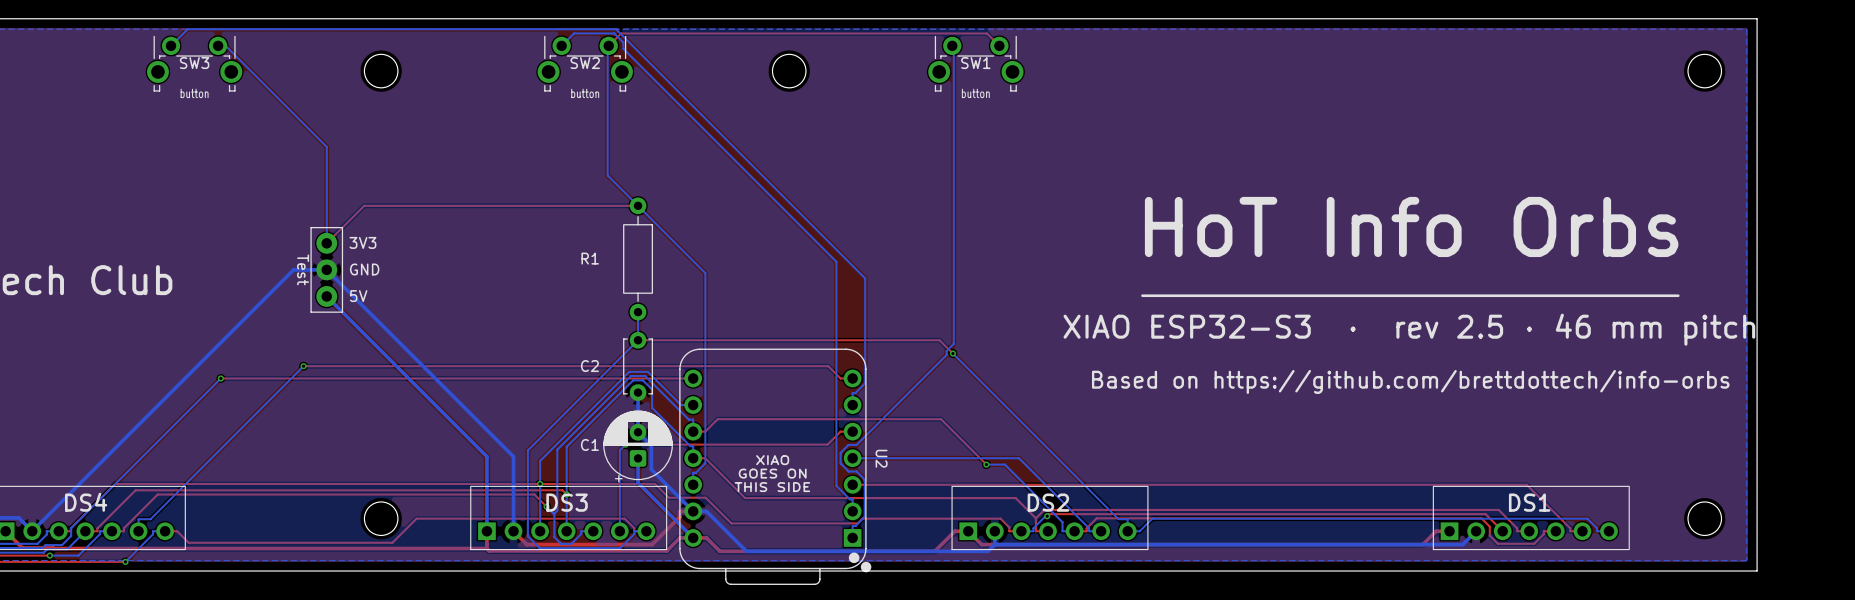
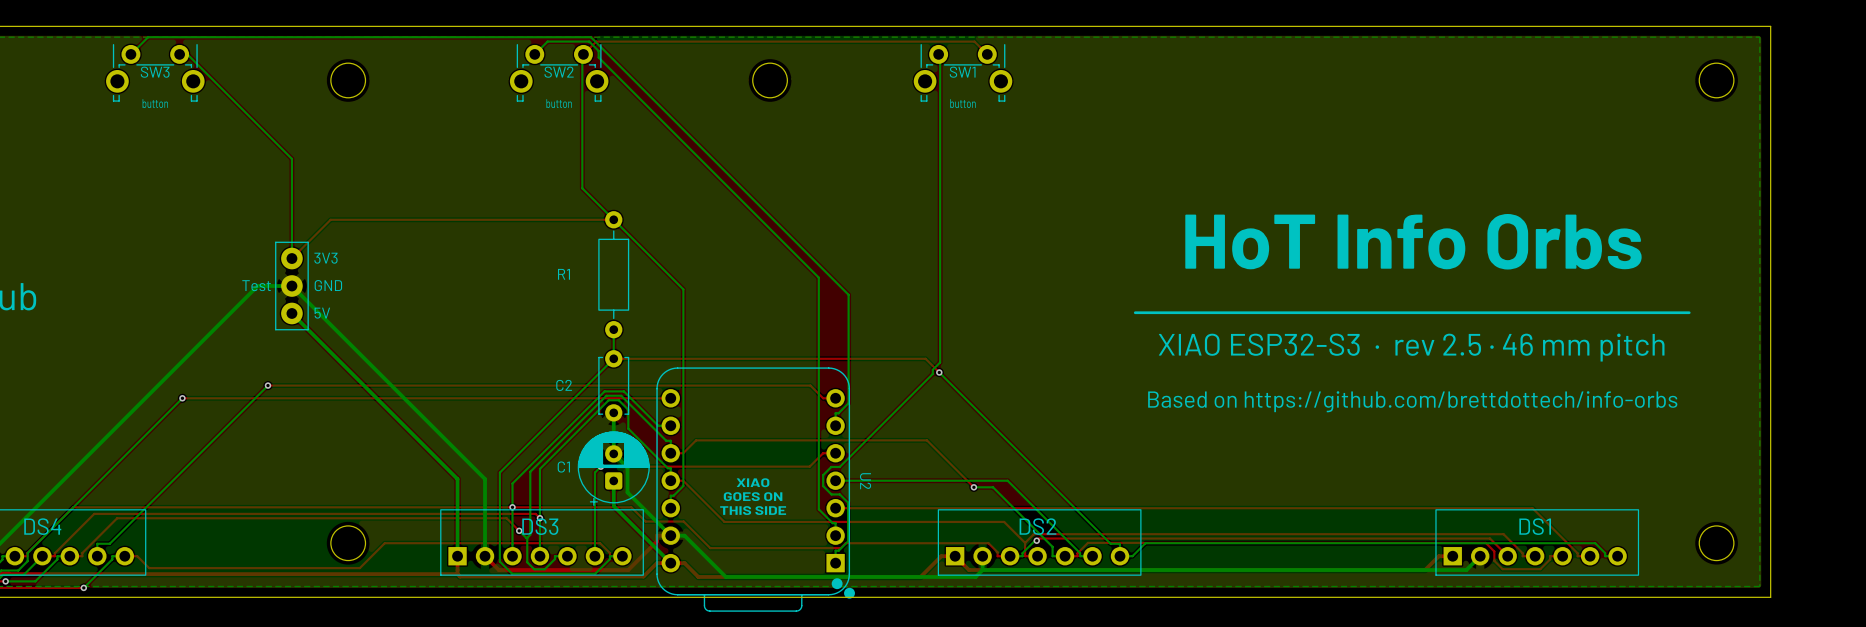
text rotation: 0° (303, 269) -> 90° counterclockwise (256, 285)

